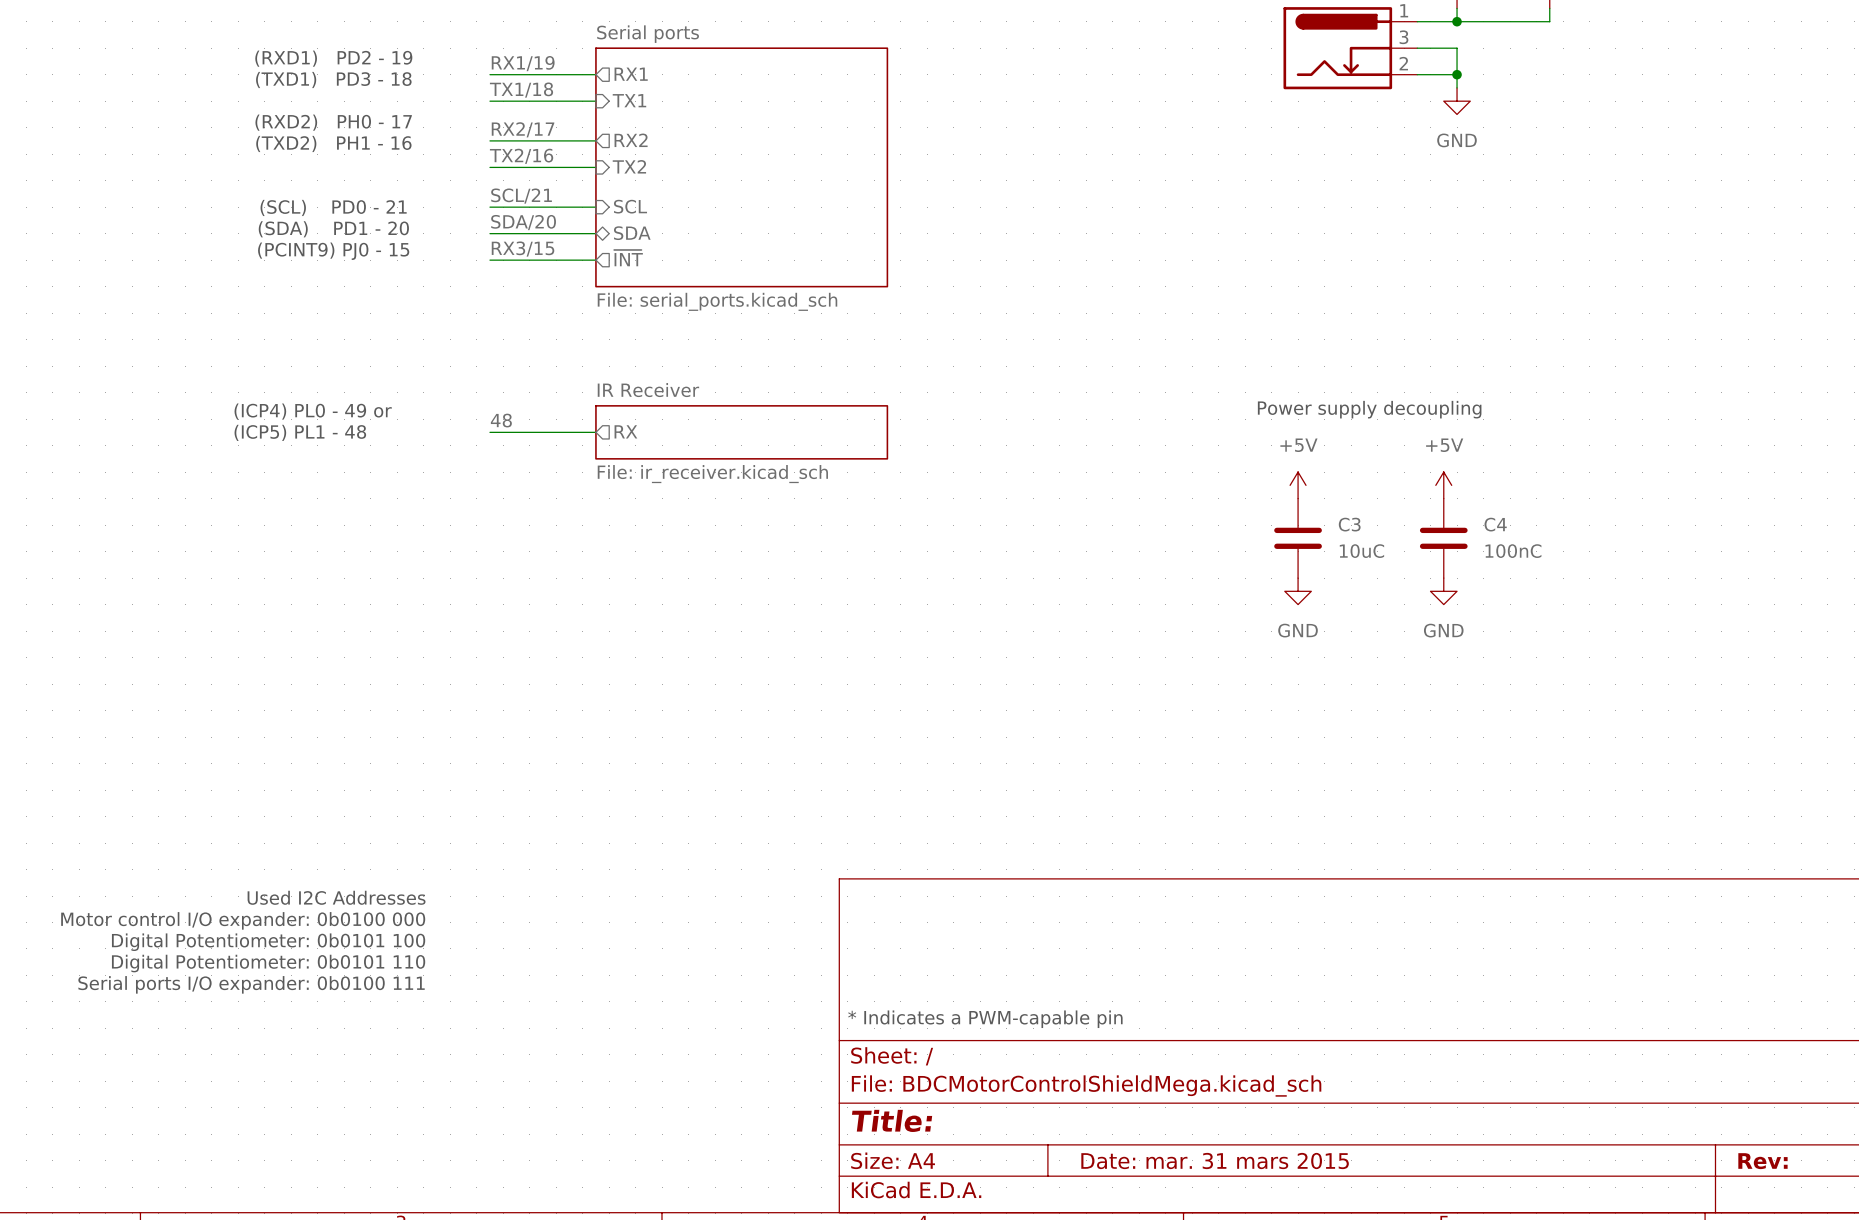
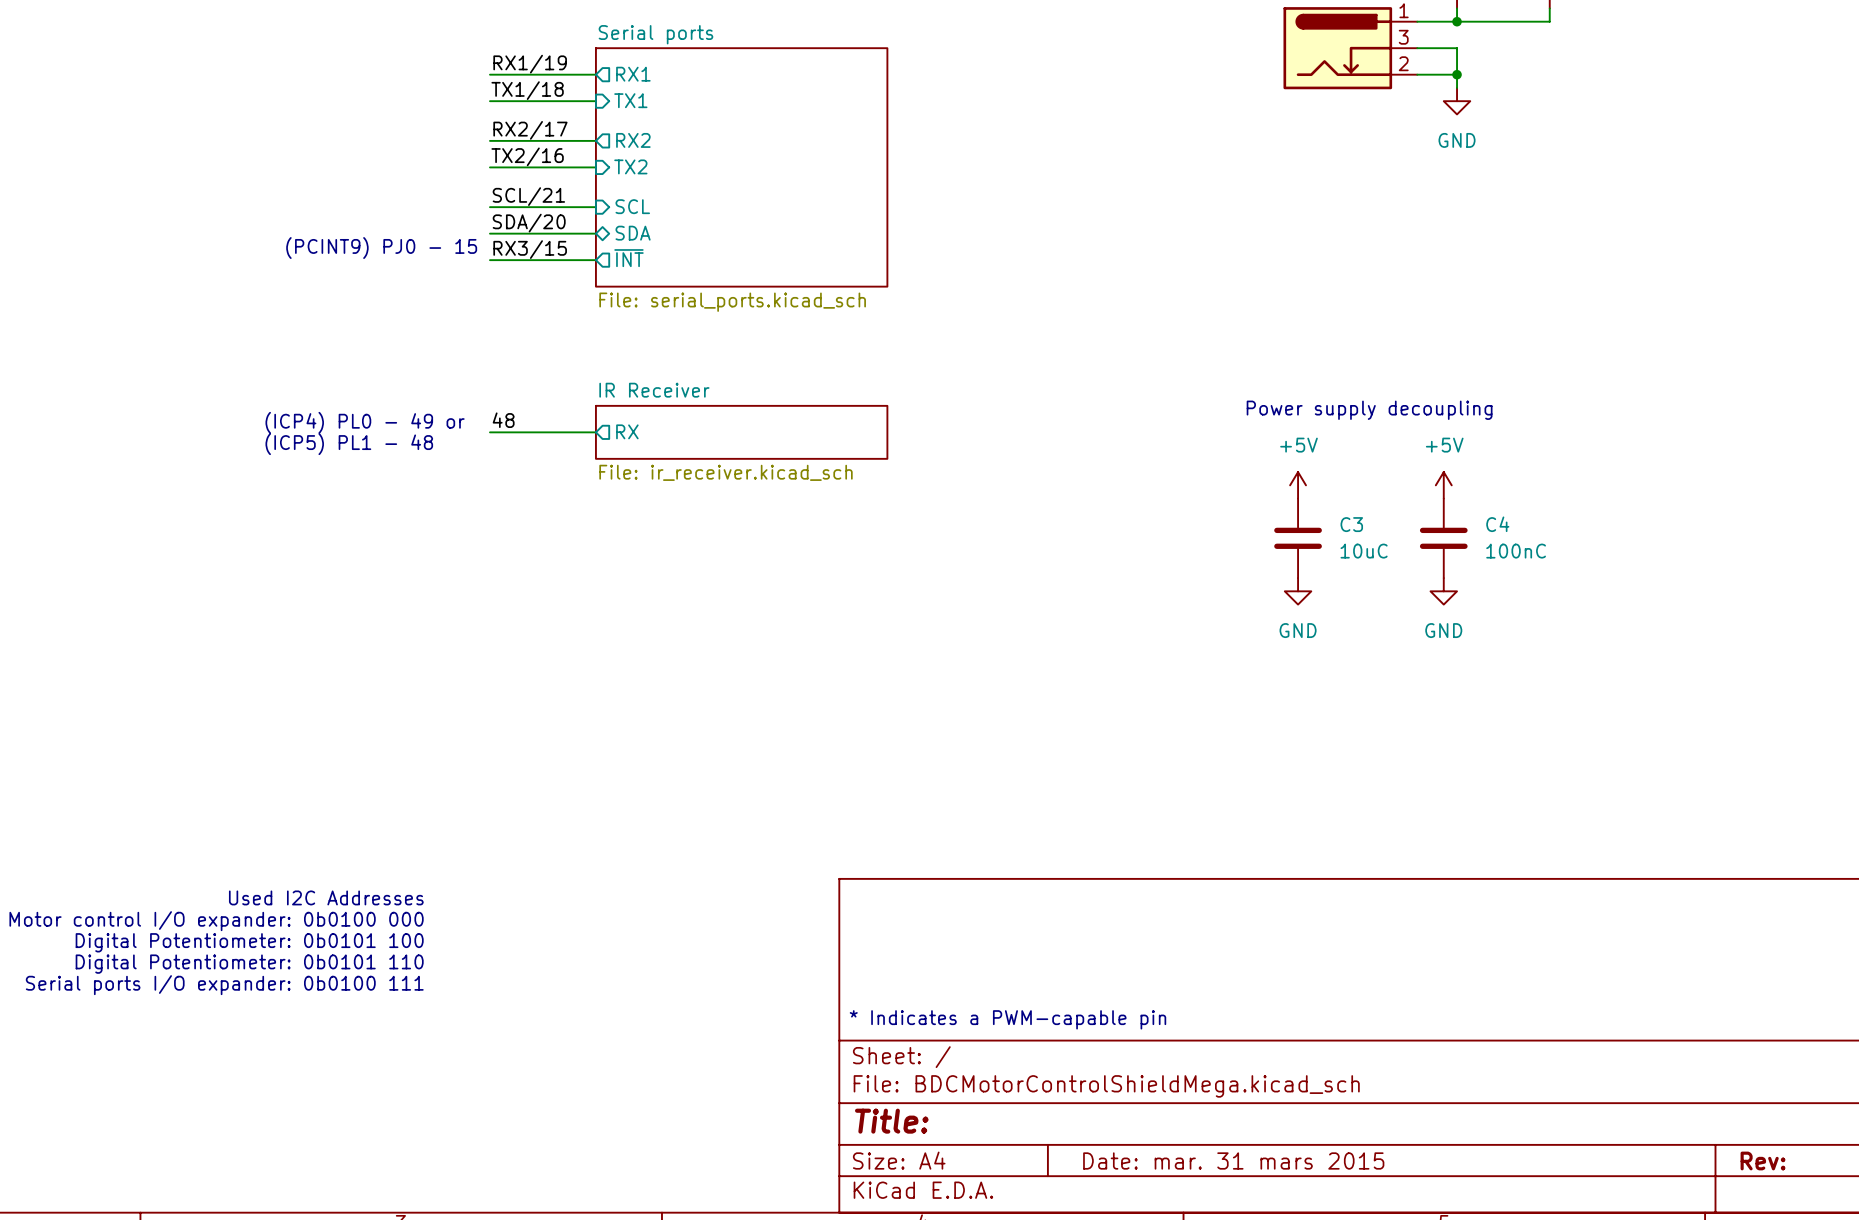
text: (RXD1) PD2 - 19 (333, 58) -> none
text: (TXD1) PD3 - 18 (333, 79) -> none
text: (RXD2) PH0 - 17 (333, 122) -> none
text: (TXD2) PH1 - 16 (333, 143) -> none
text: (SCL) PD0 - 21 (333, 207) -> none
text: (SDA) PD1 - 20 (333, 229) -> none
text position: (PCINT9) PJ0 - 15 (333, 251) -> (PCINT9) PJ0 - 15 (381, 248)
text position: (ICP4) PL0 - 49 or (313, 411) -> (ICP4) PL0 - 49 or (365, 422)
text position: (ICP5) PL1 - 48 (300, 432) -> (ICP5) PL1 - 48 (349, 444)

